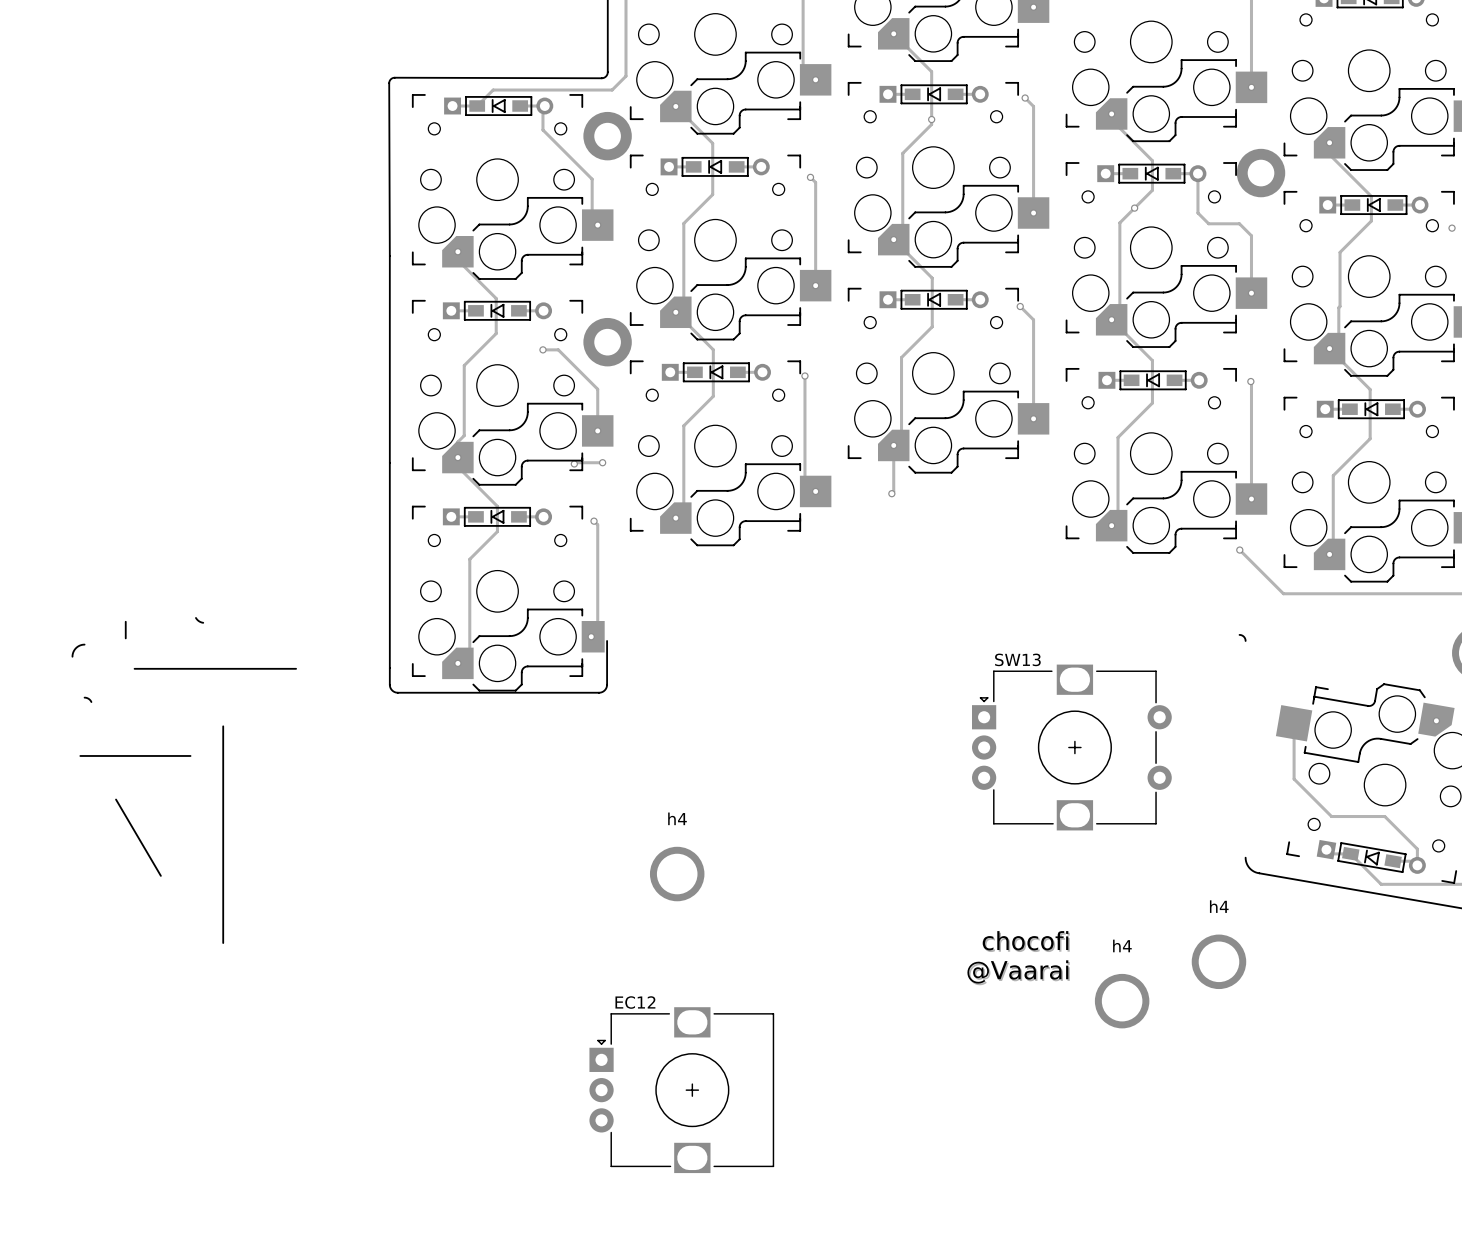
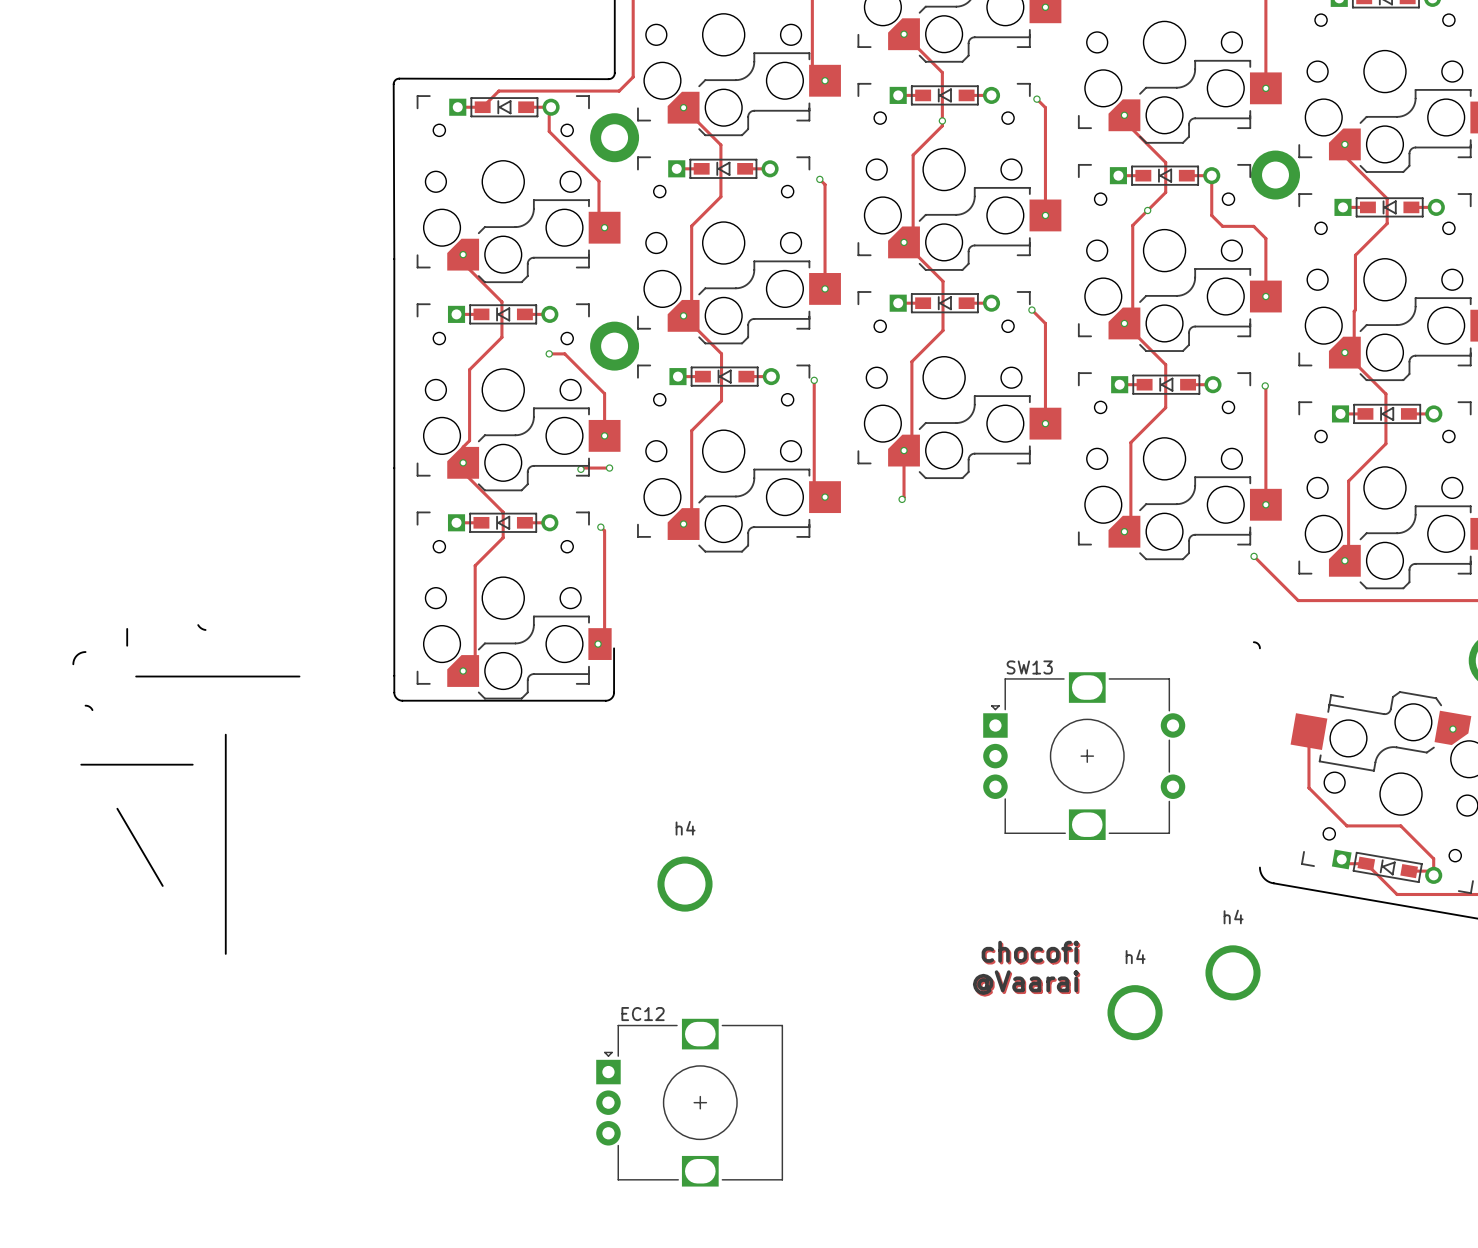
via: (1452, 228) -> none

